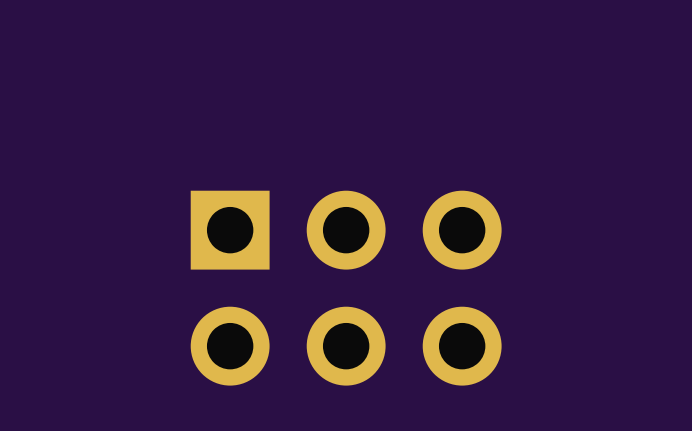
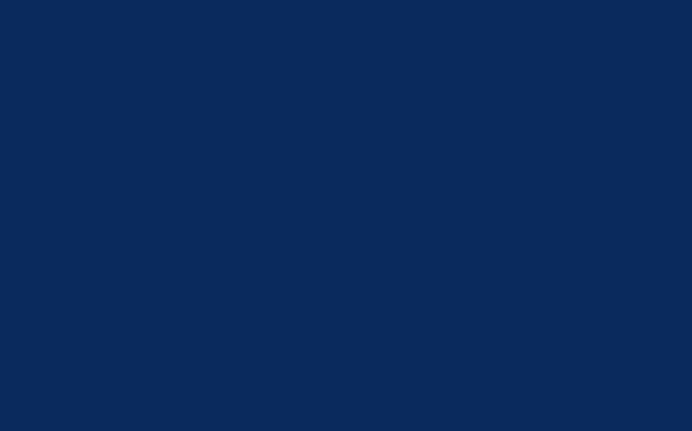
part: (346, 288) -> none

